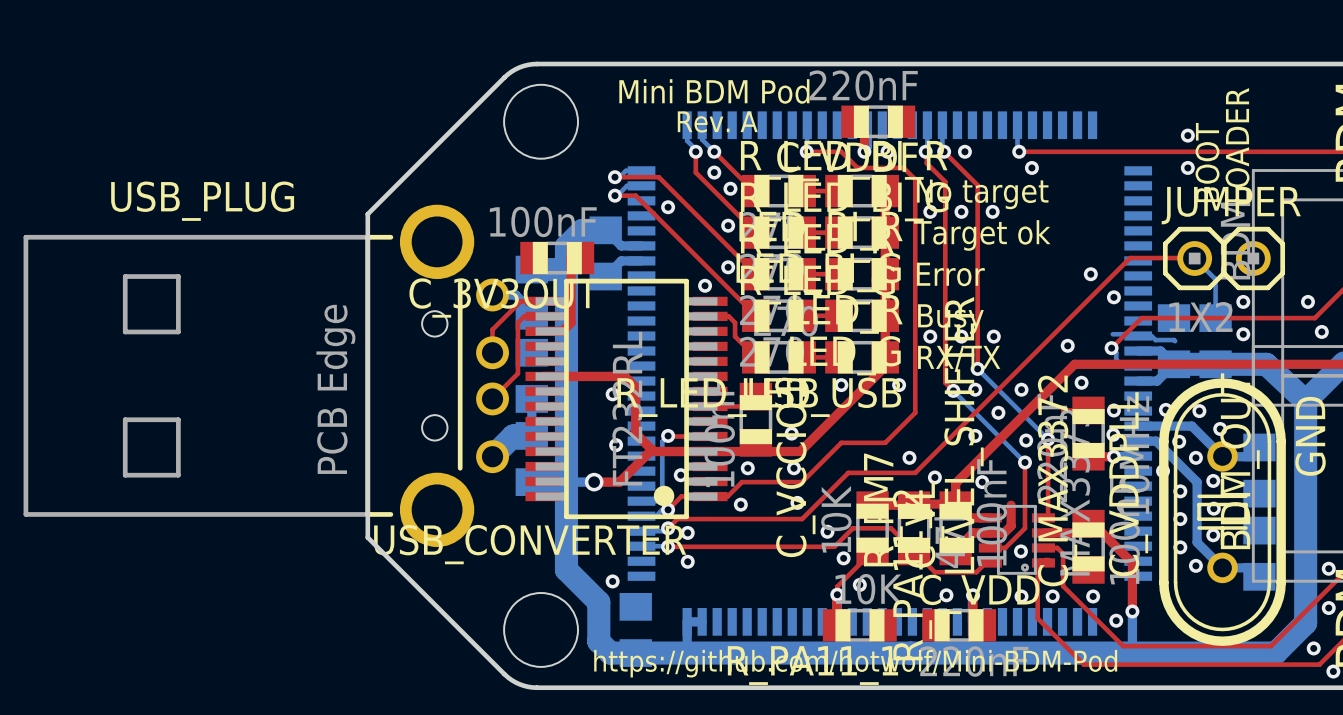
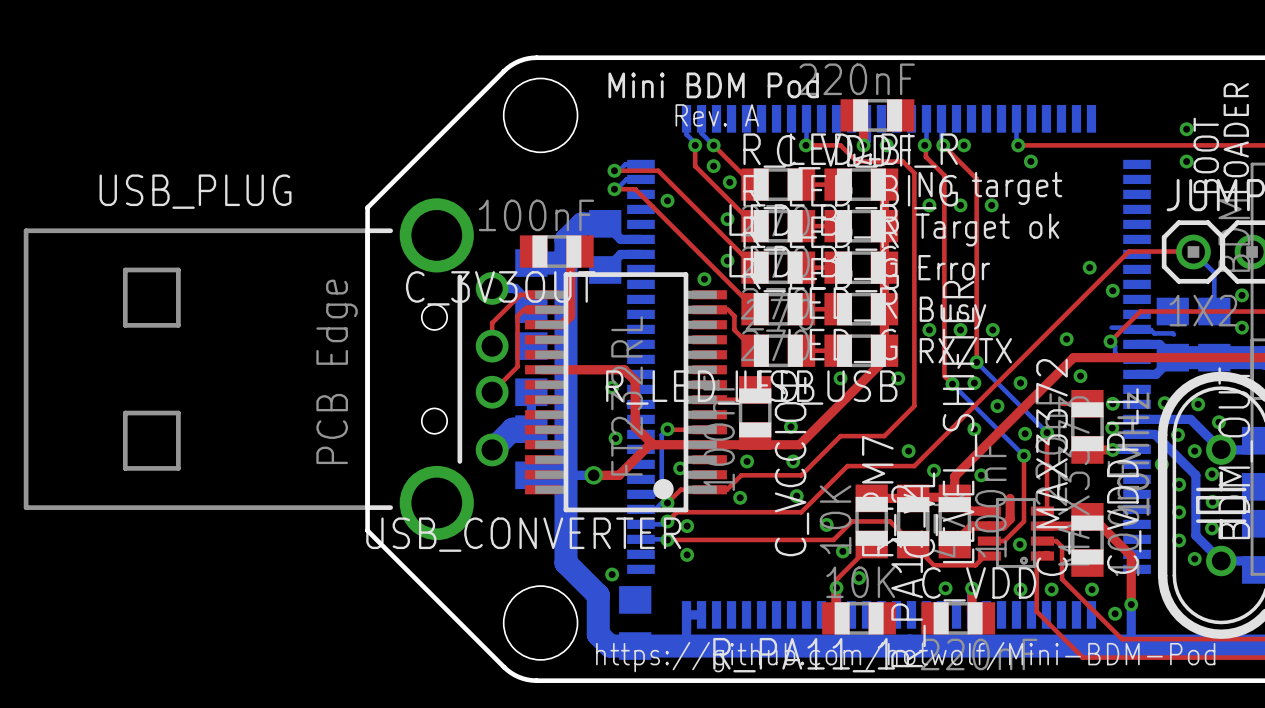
line: none -> (854, 154) (854, 163)
line: none -> (870, 154) (870, 163) (854, 159) (870, 154)
line: none -> (870, 159) (879, 159)

